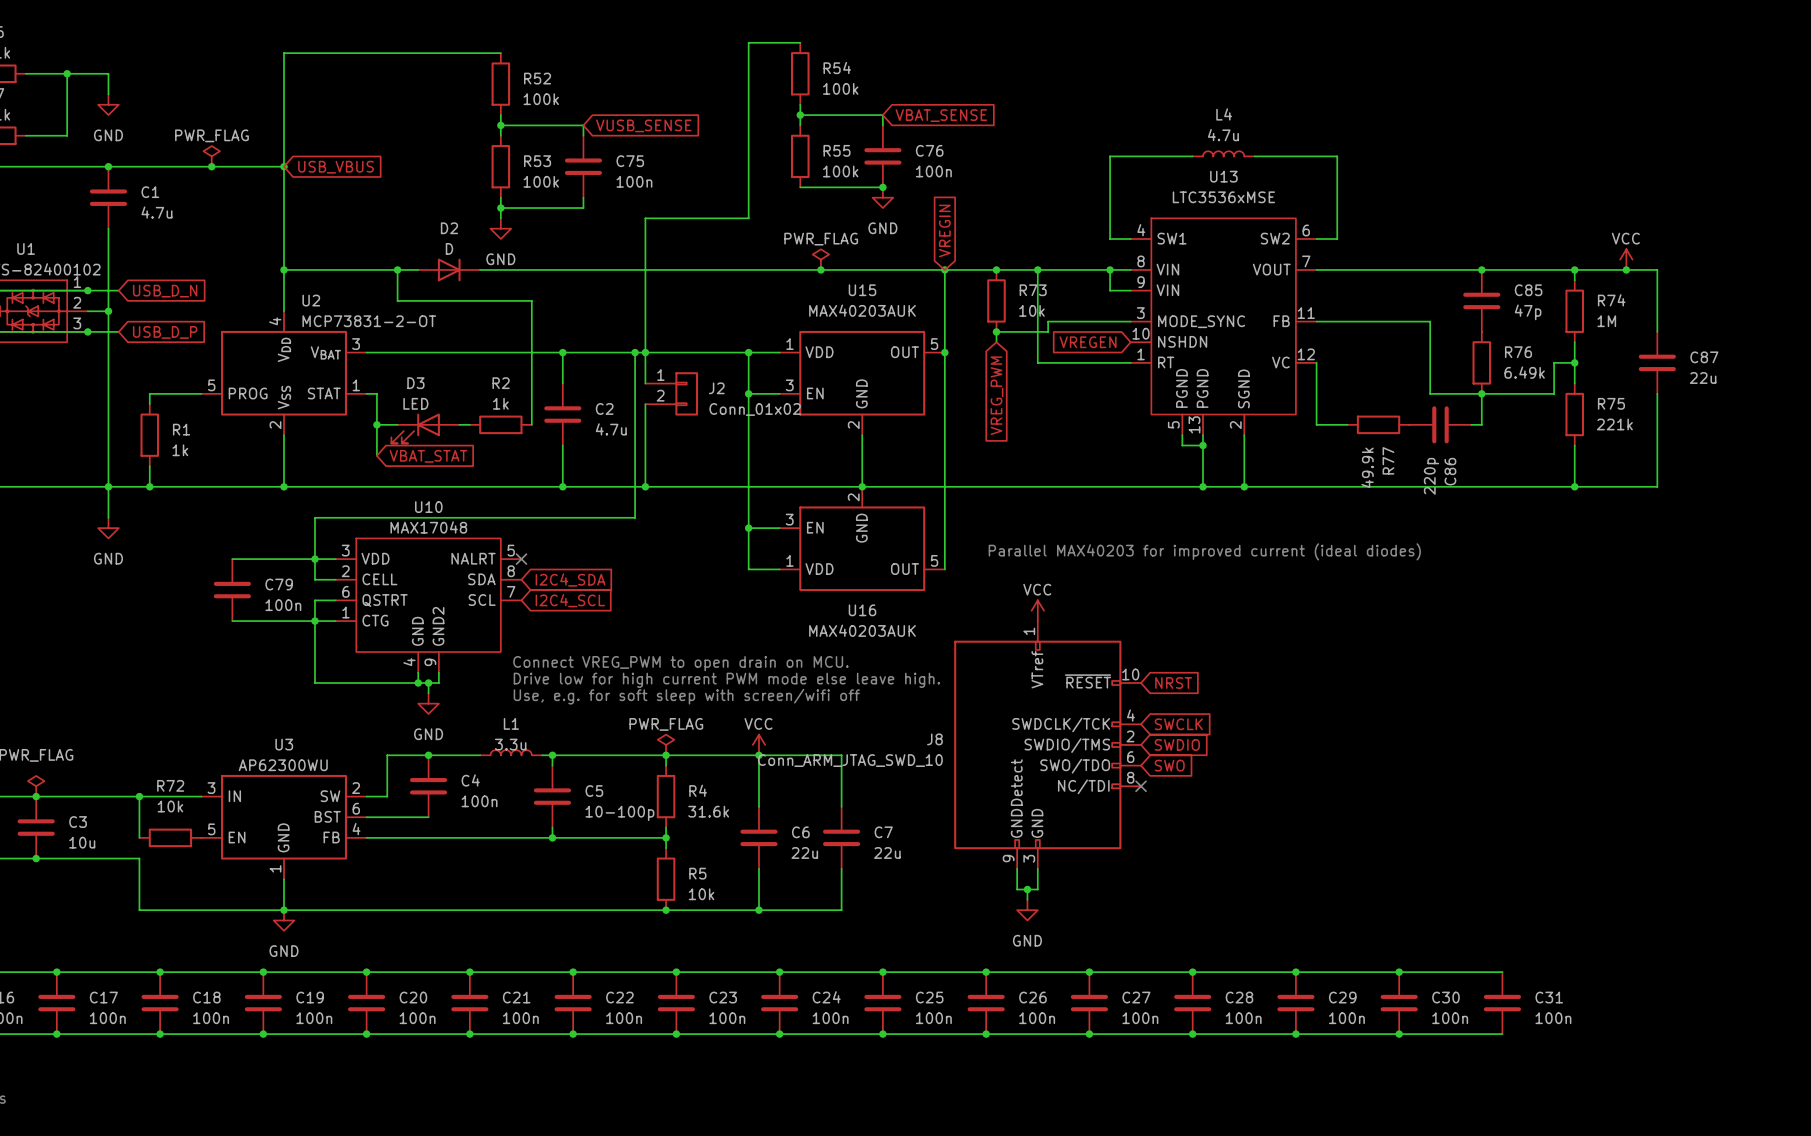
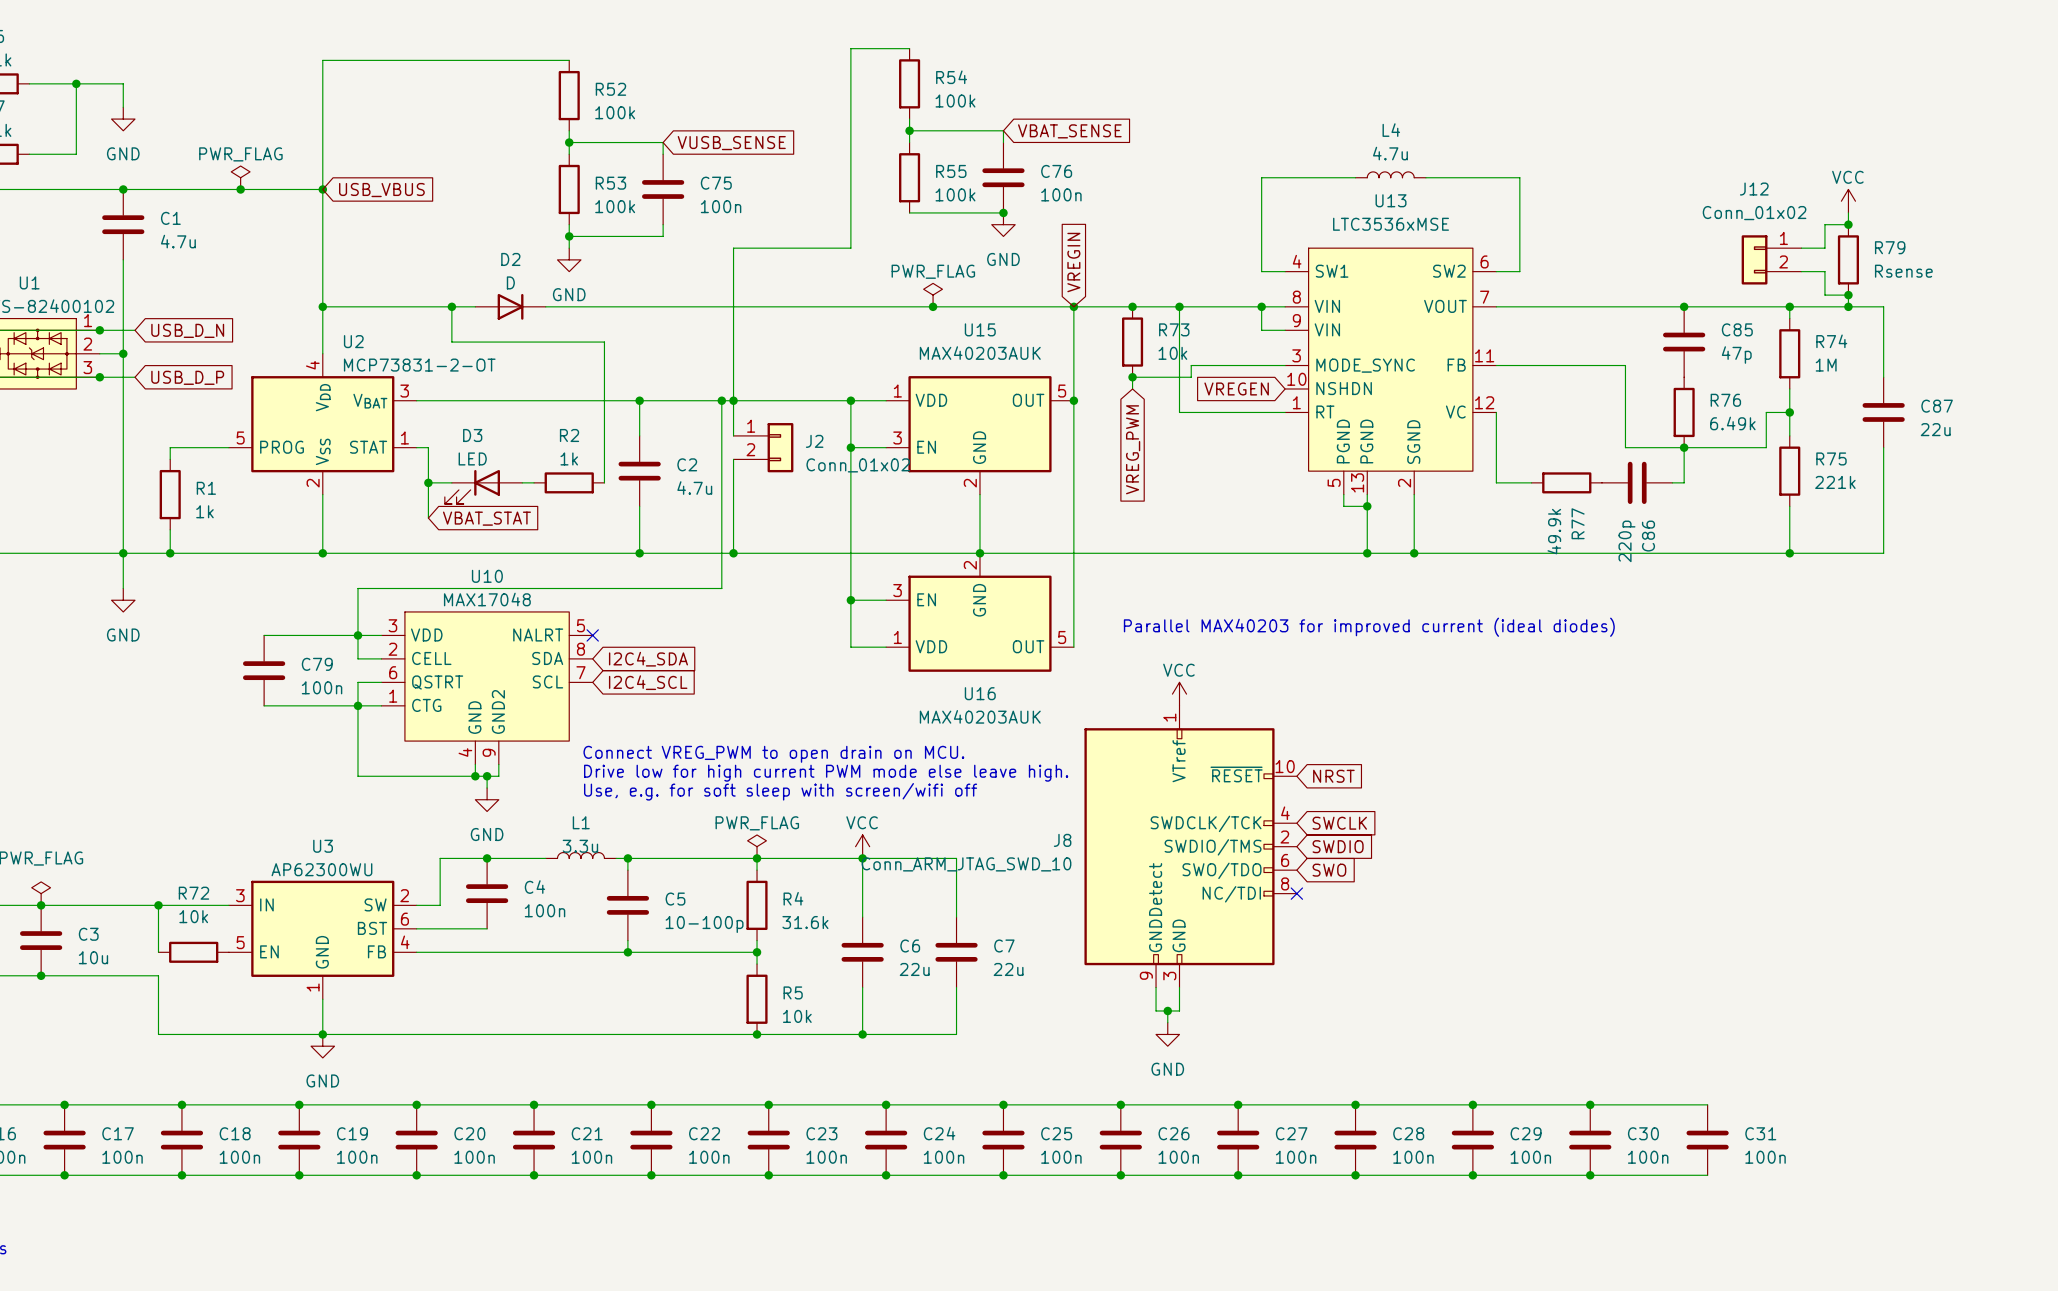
wire: none -> (1848, 212) (1848, 224) (1824, 224) (1824, 248) (1801, 248)
junction: none -> (1848, 224)
J12: none -> Conn_01x02 (1771, 259)
R79: none -> Rsense (1848, 259)
wire: none -> (1801, 271) (1824, 271) (1824, 295) (1848, 295) (1848, 306)
power symbol position: VCC (1626, 259) -> VCC (1848, 201)
junction: none -> (1848, 295)

